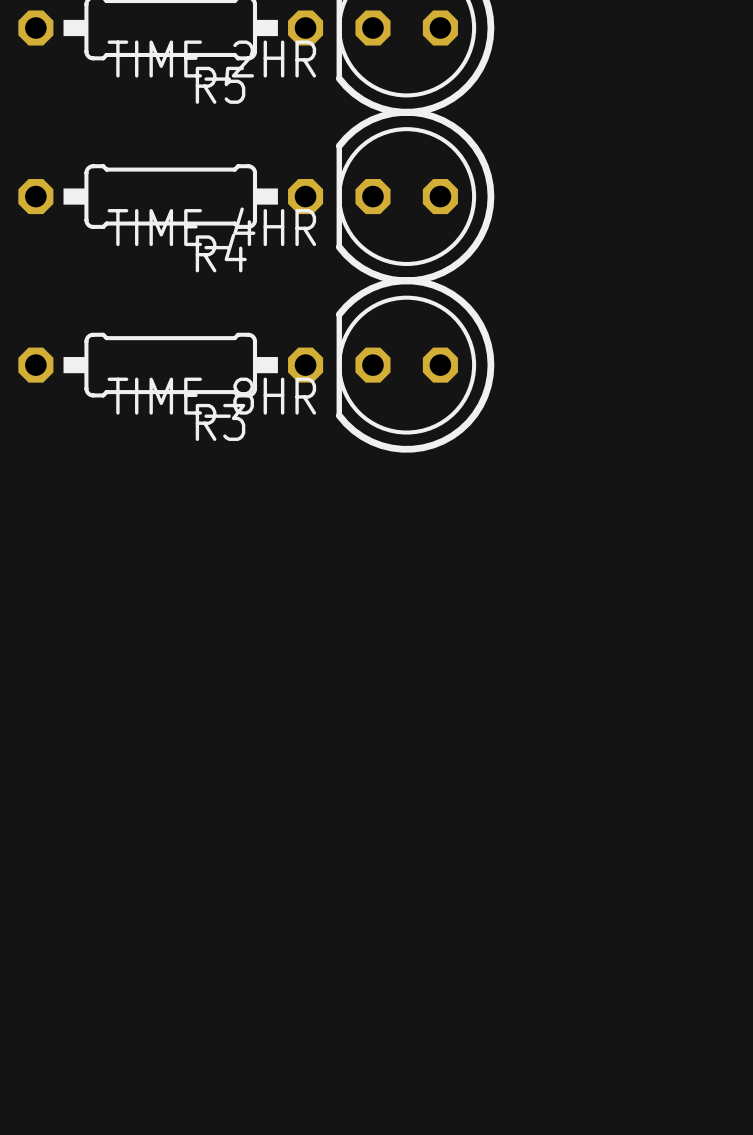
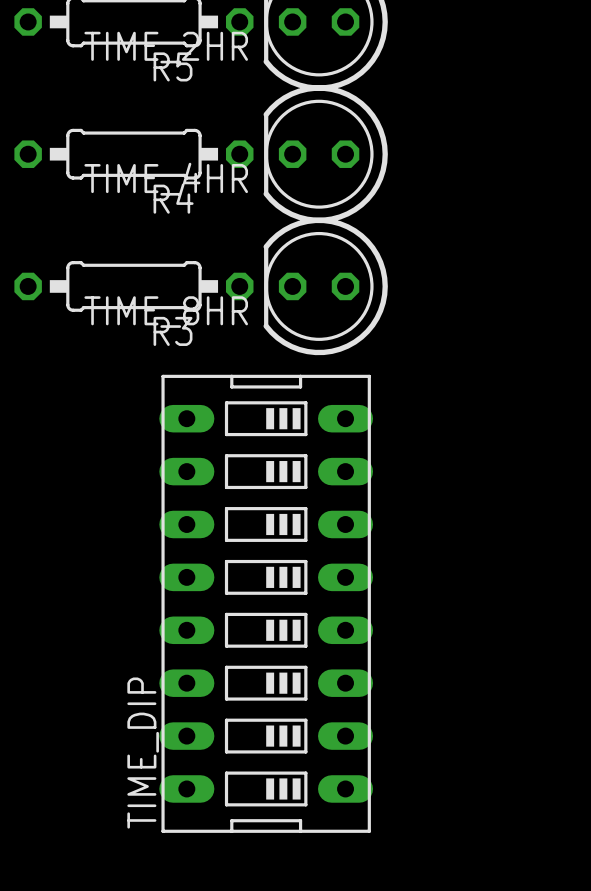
TIME_DIP: none -> (266, 603)

